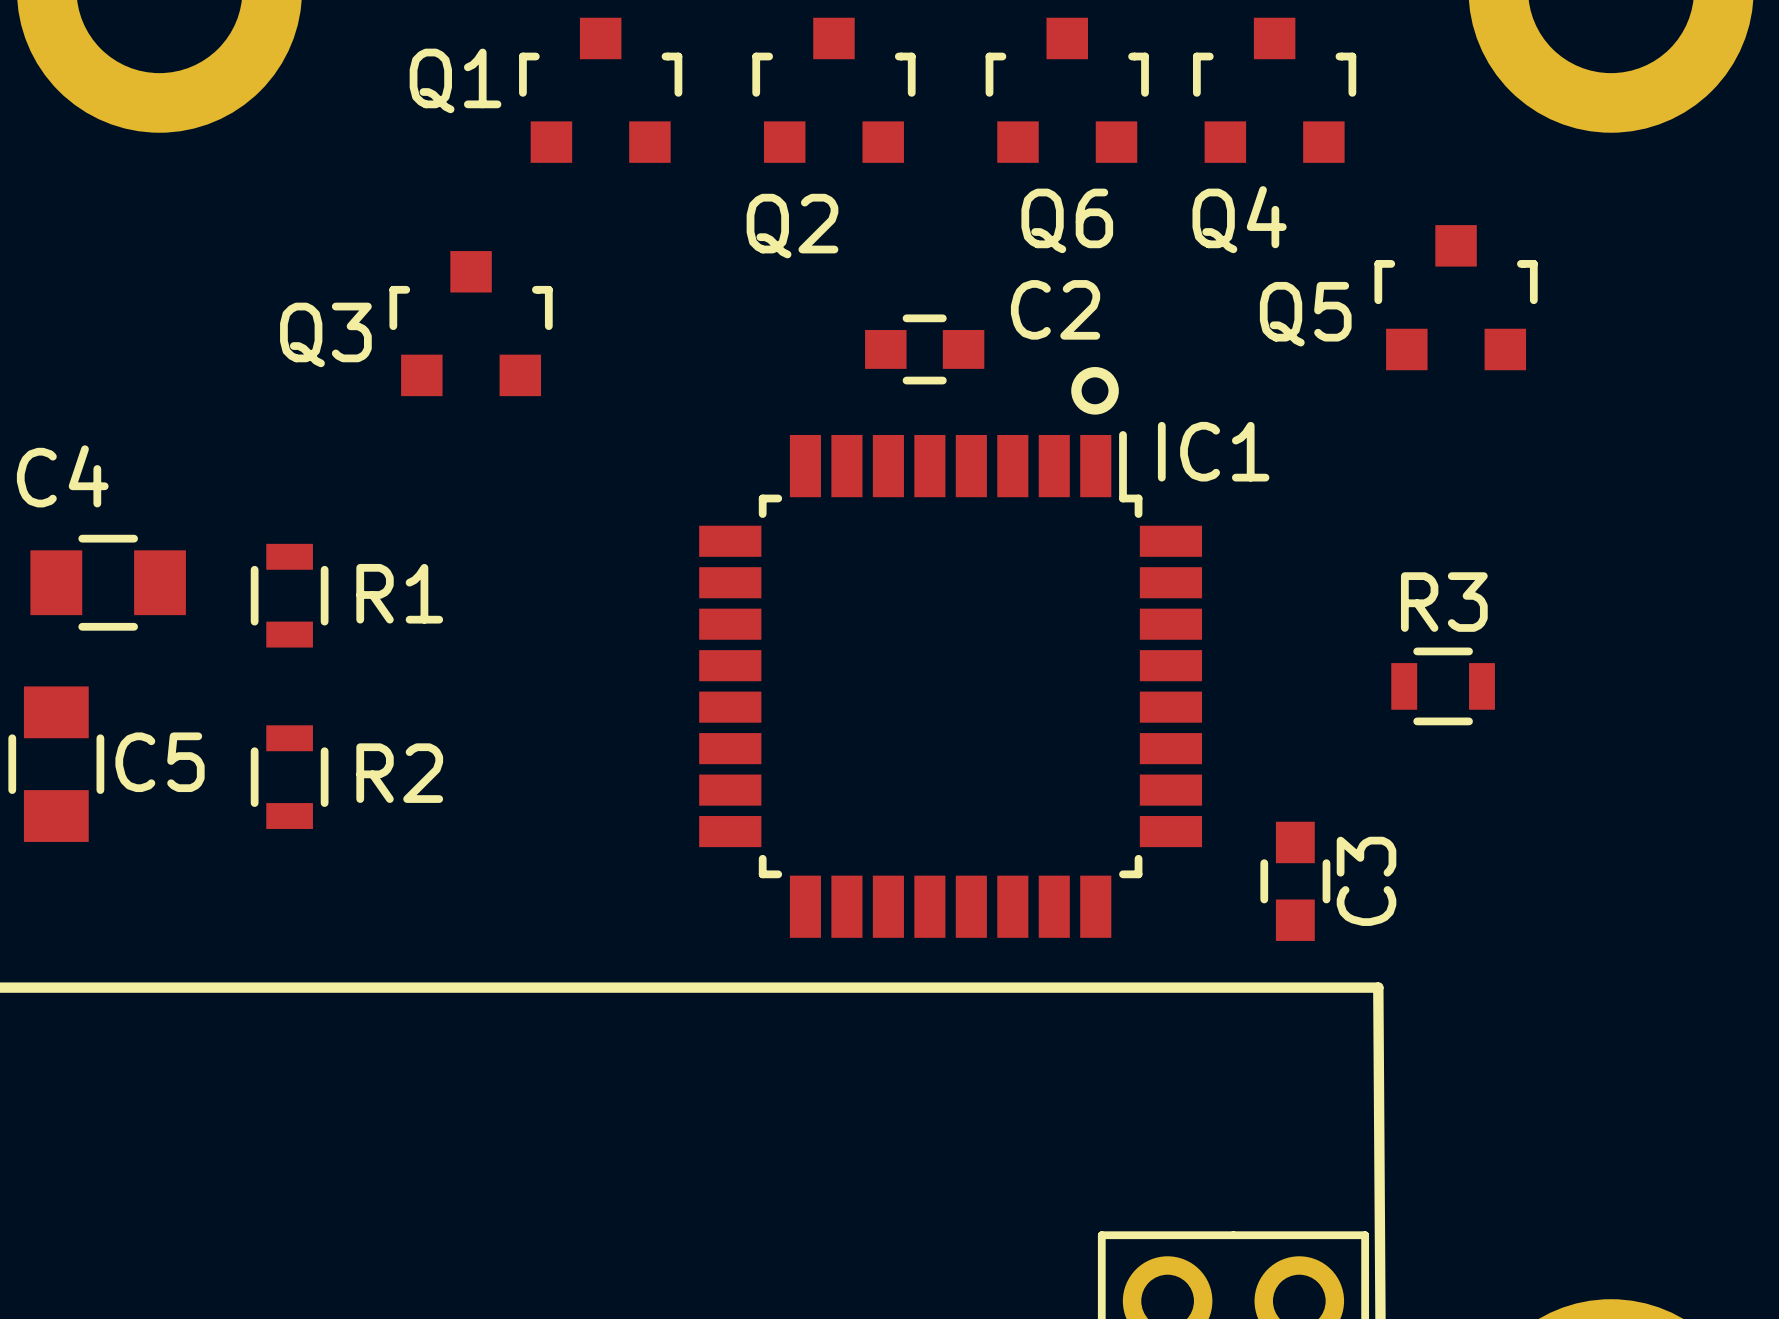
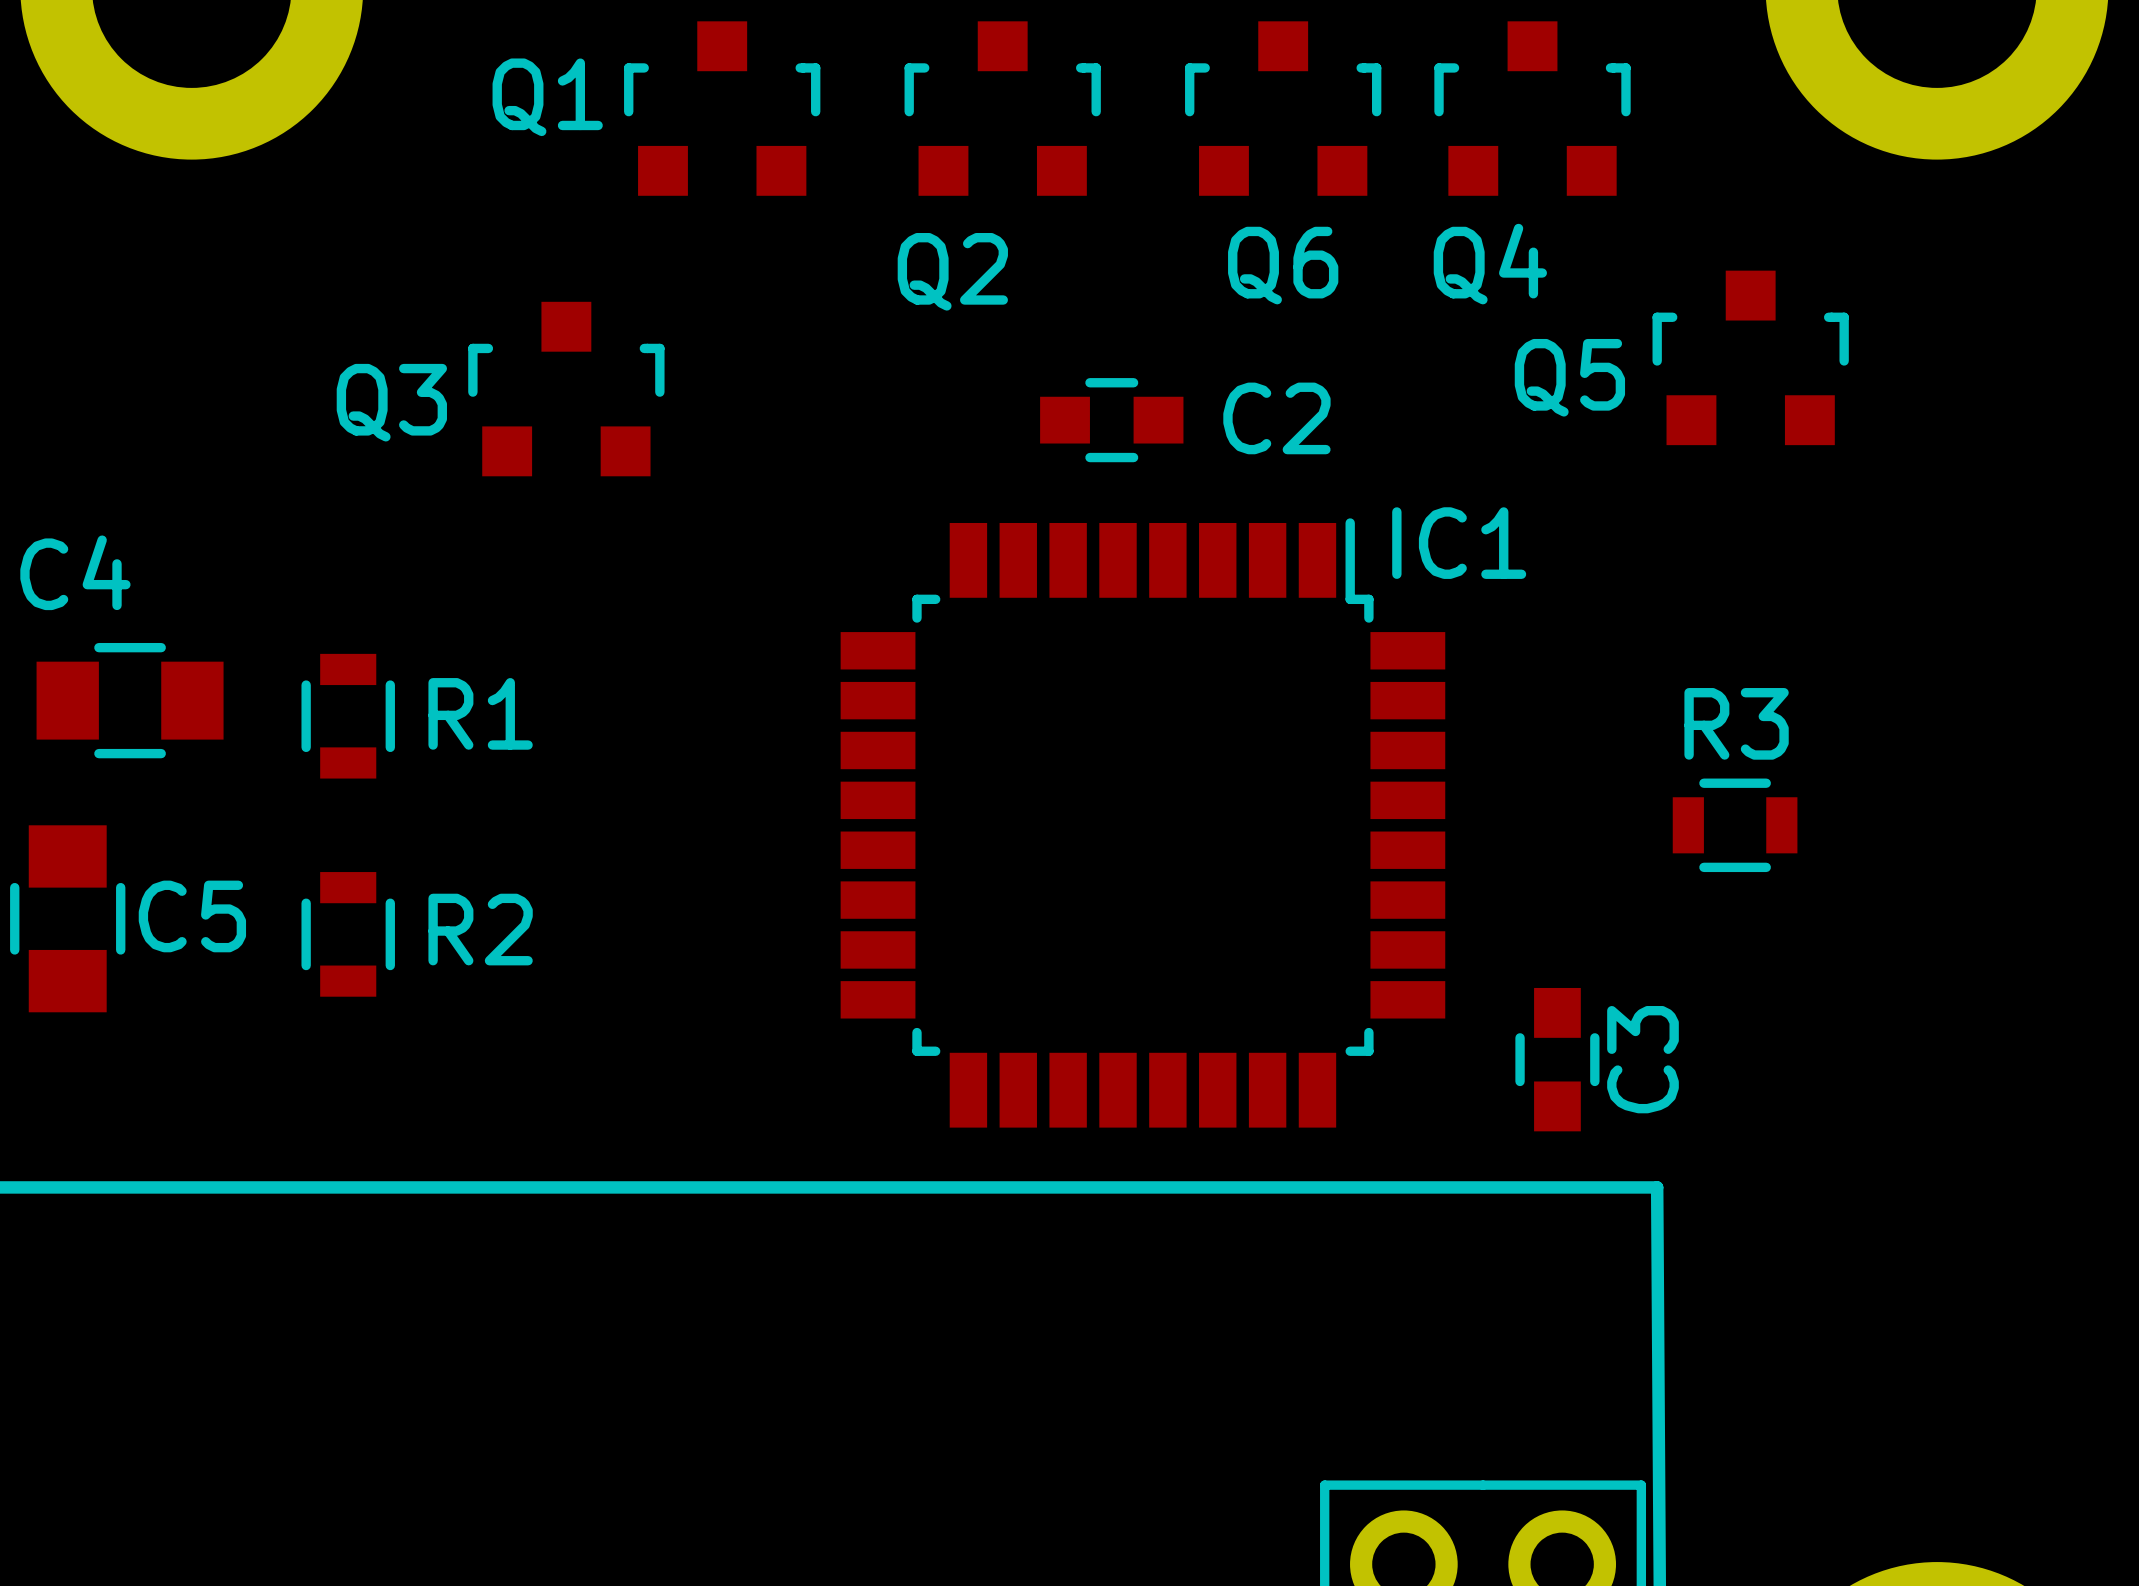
C2 name position: C2 (1055, 309) -> C2 (1276, 418)
drawing: [1071, 367, 1119, 415] -> none

